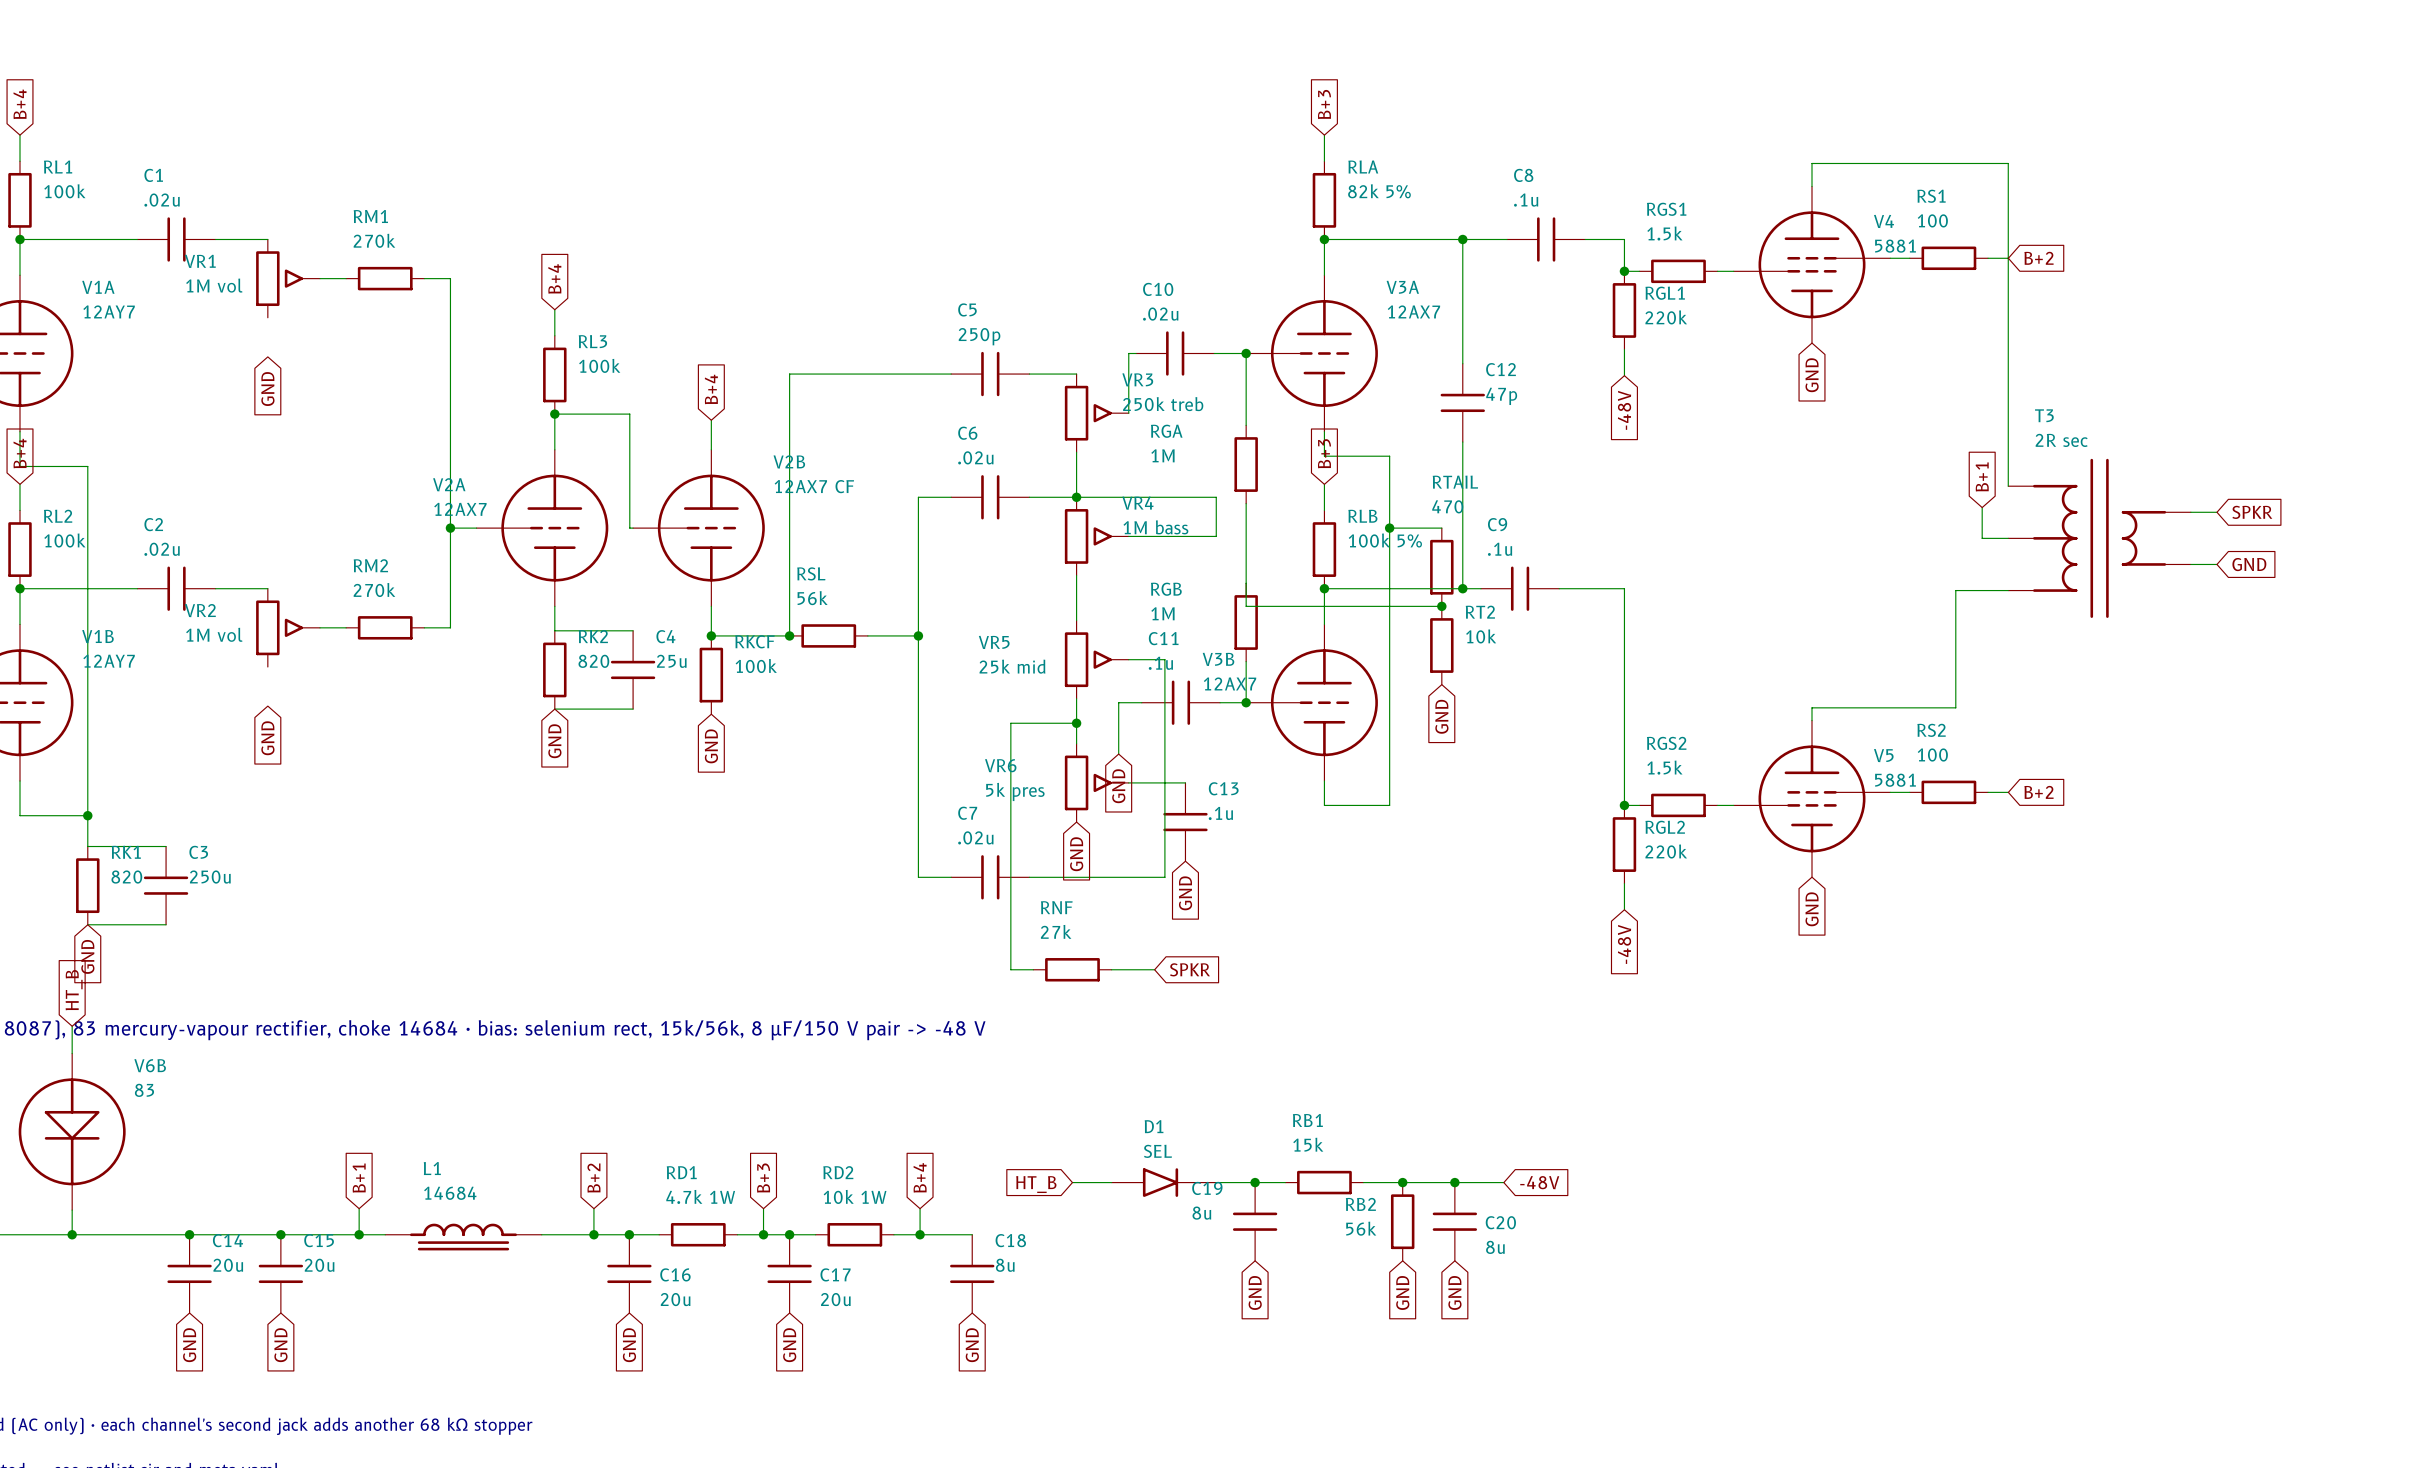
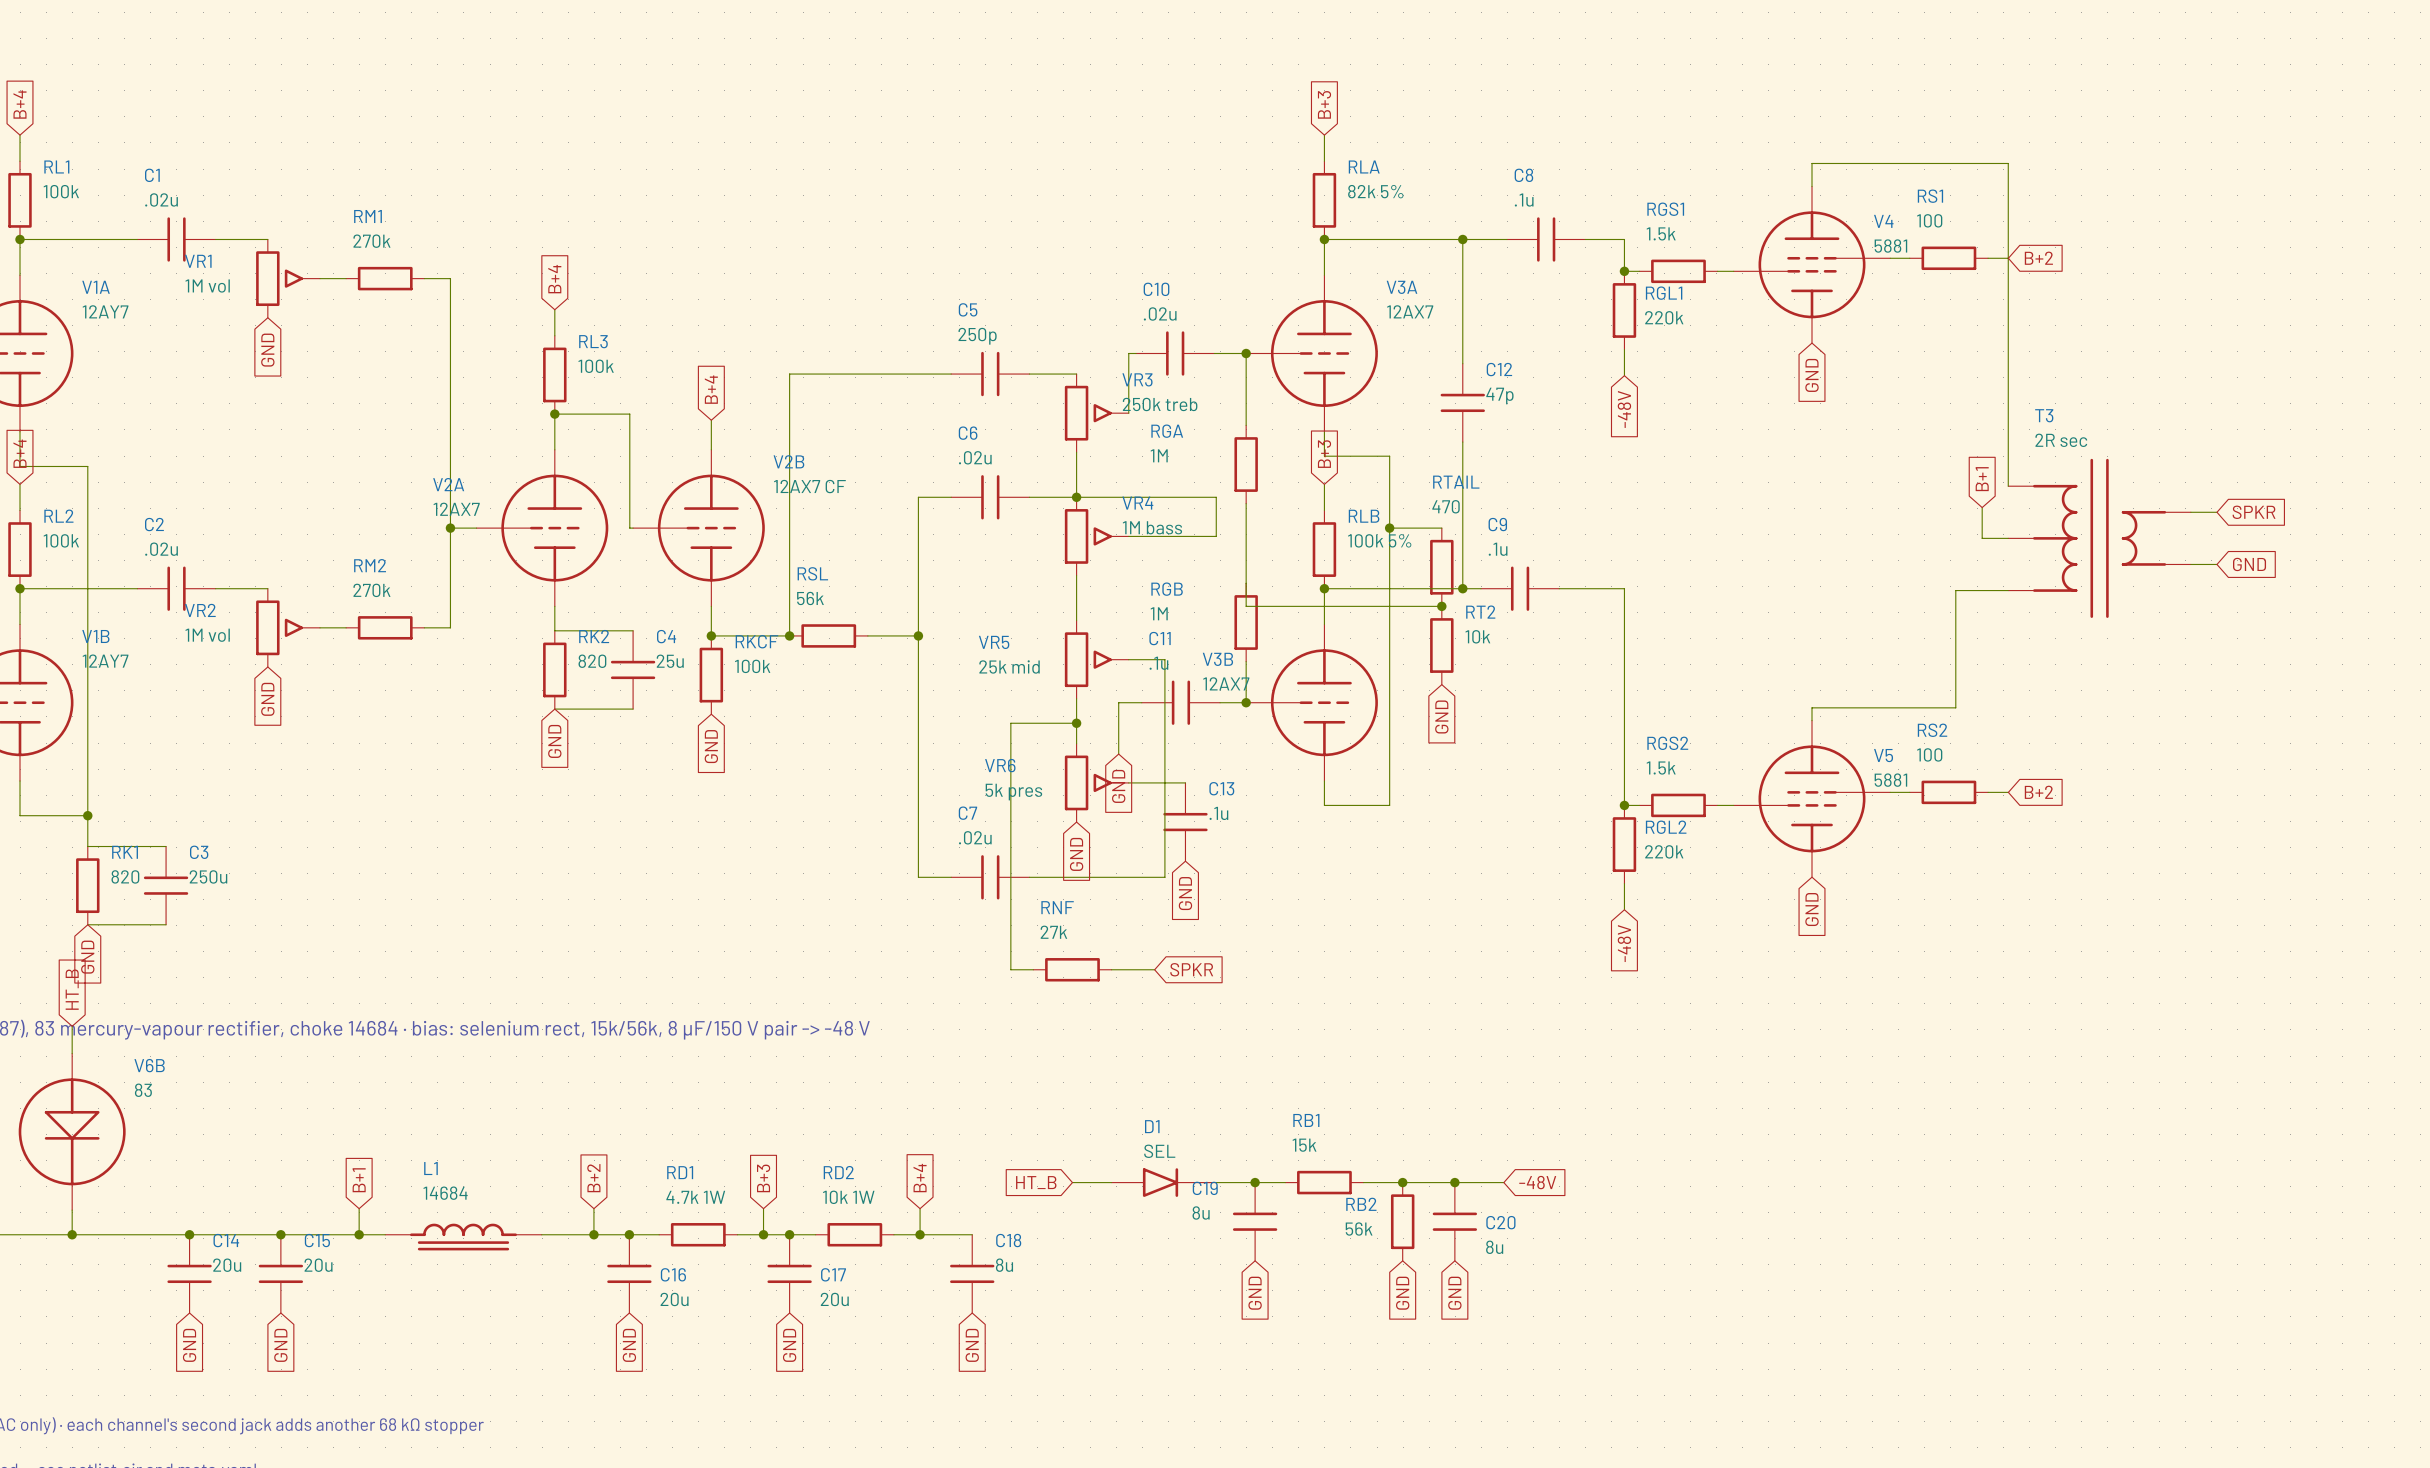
global label position: GND (267, 389) -> GND (267, 350)
global label position: GND (267, 738) -> GND (267, 699)

